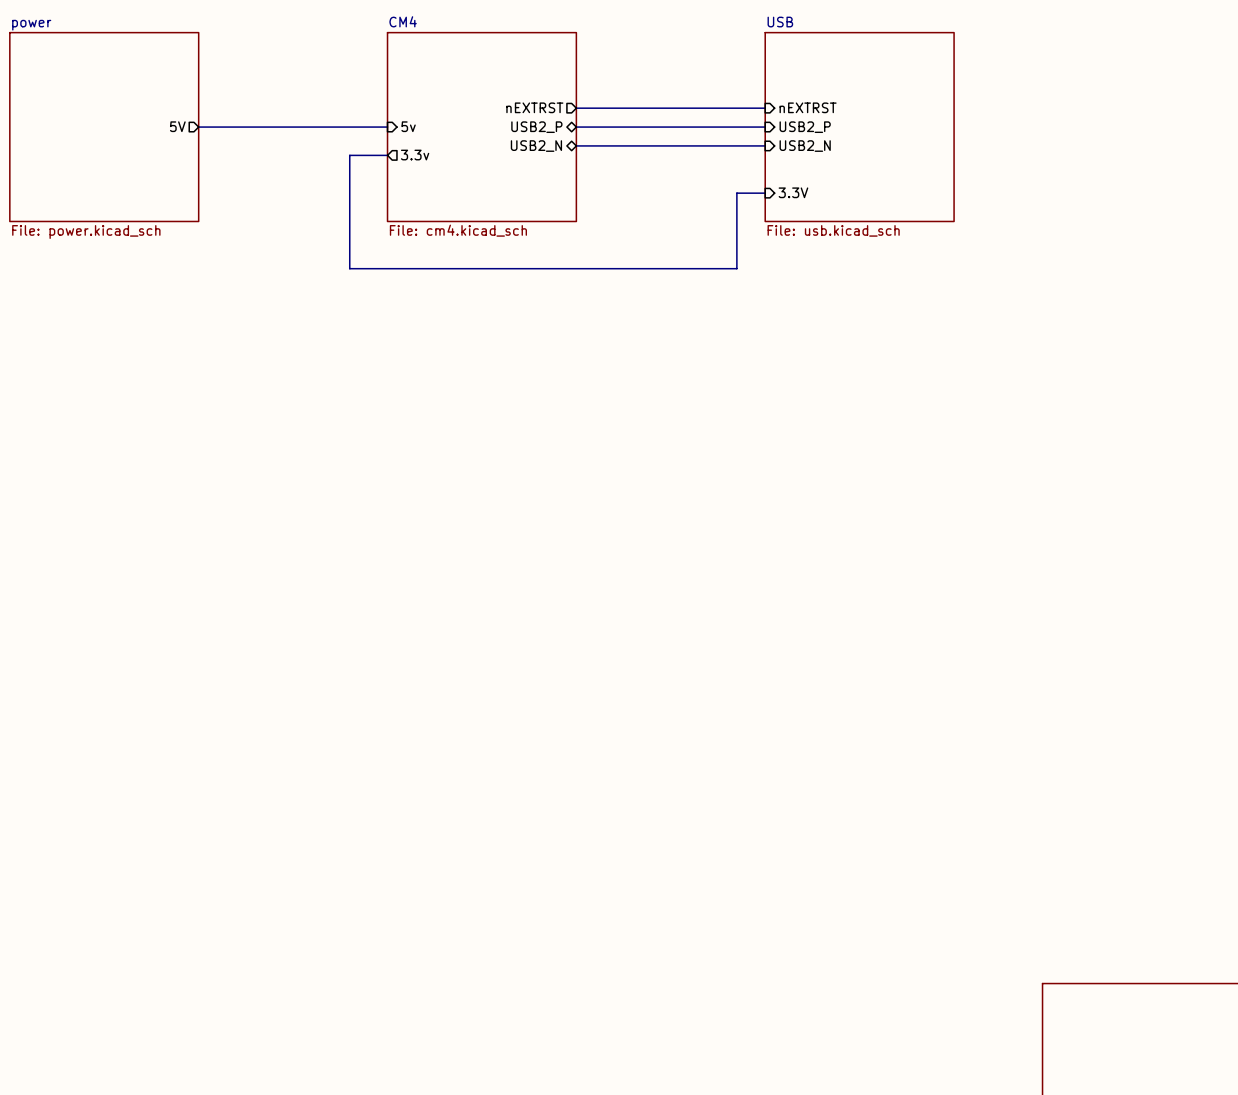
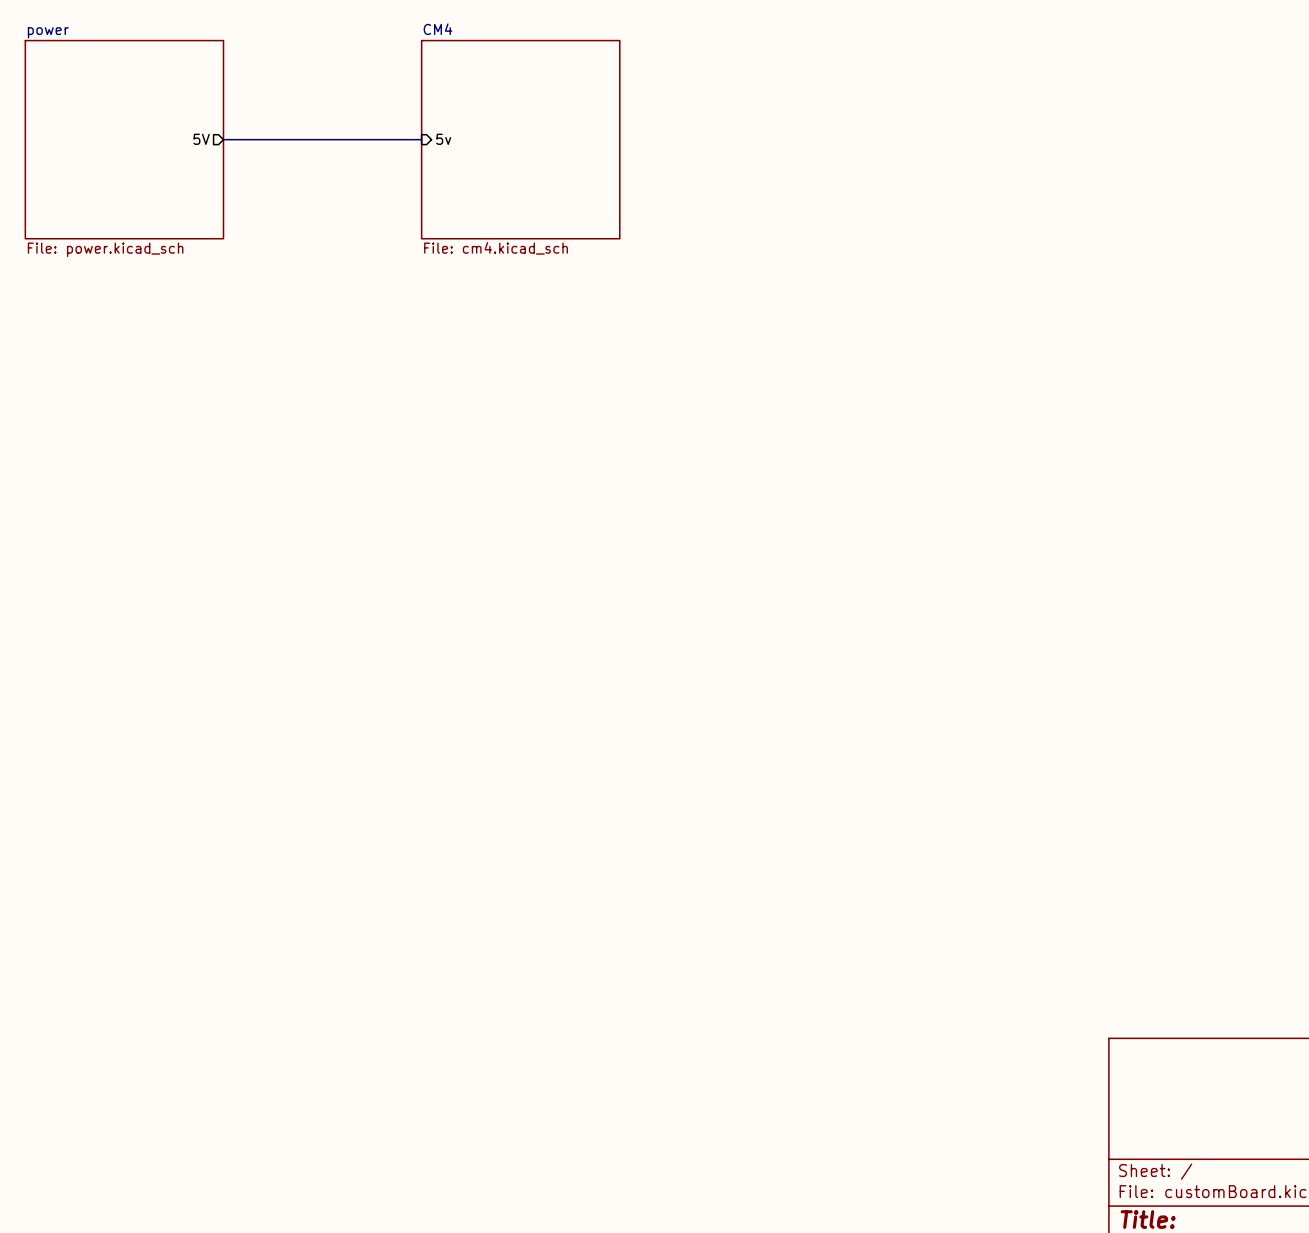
sheet pin: nEXTRST (534, 107) -> none
sheet pin: nEXTRST (808, 107) -> none
wire: (576, 108) (765, 108) -> none
sheet pin: USB2_P (536, 127) -> none
wire: (576, 127) (765, 127) -> none
sheet pin: USB2_P (805, 127) -> none
sheet USB: File: usb.kicad_sch (859, 127) -> none
wire: (576, 145) (765, 145) -> none
sheet pin: USB2_N (536, 146) -> none
sheet pin: USB2_N (805, 146) -> none
wire: (387, 155) (349, 155) (349, 268) (736, 268) (736, 193) (765, 193) -> none
sheet pin: 3.3v (415, 155) -> none
sheet pin: 3.3V (793, 192) -> none

